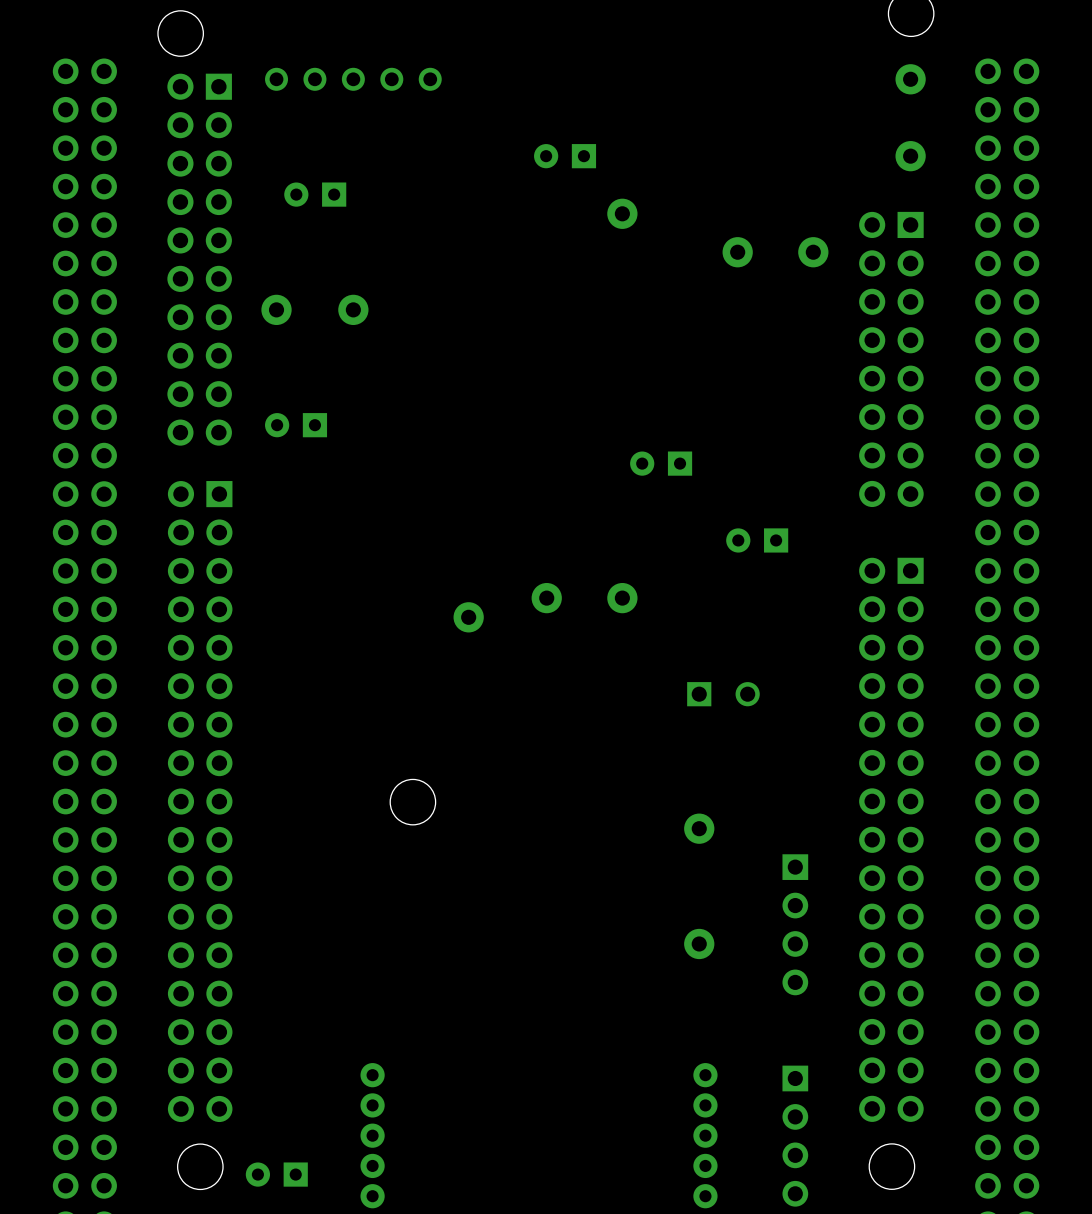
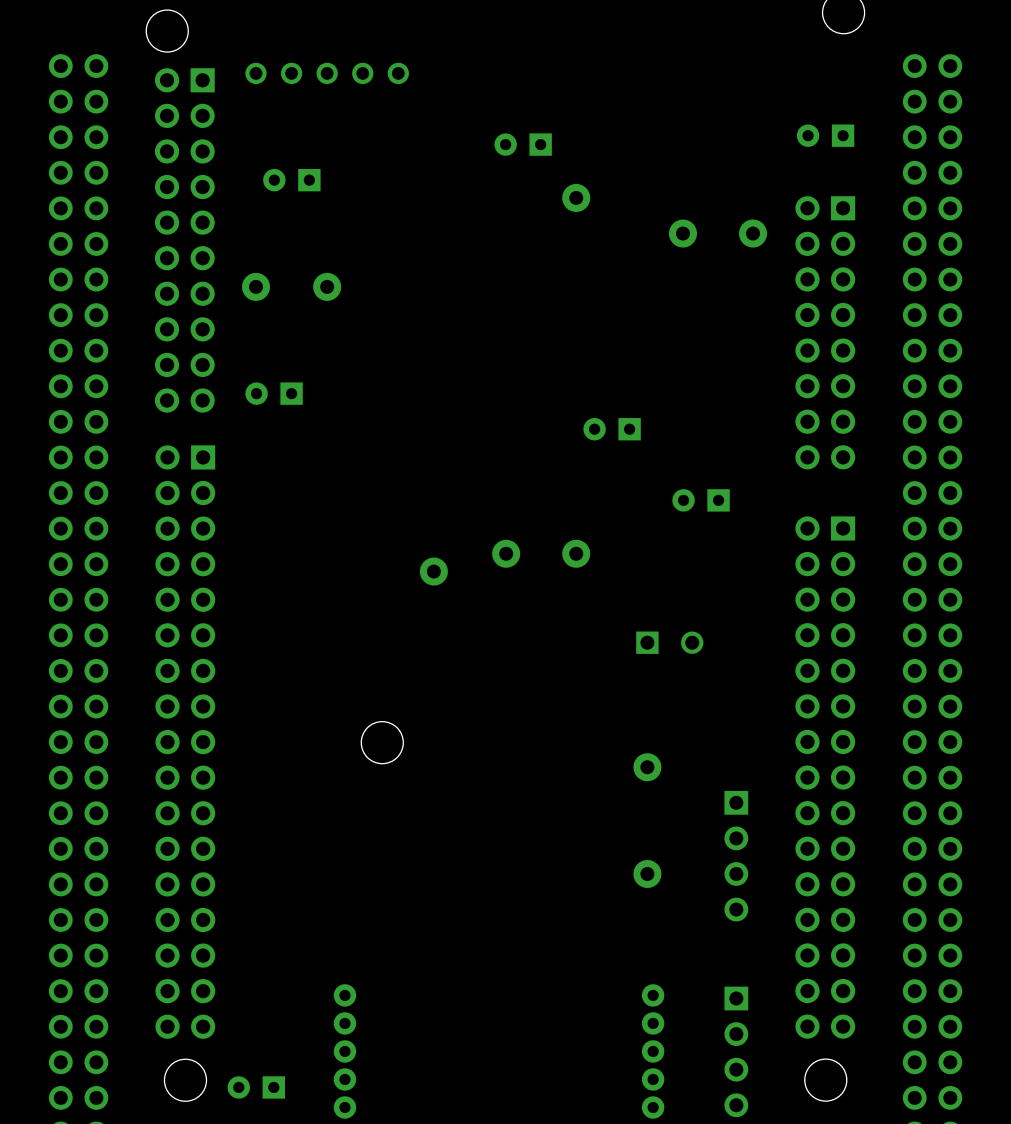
part: (910, 79) -> none
part: none -> (825, 135)
part: (910, 156) -> none

